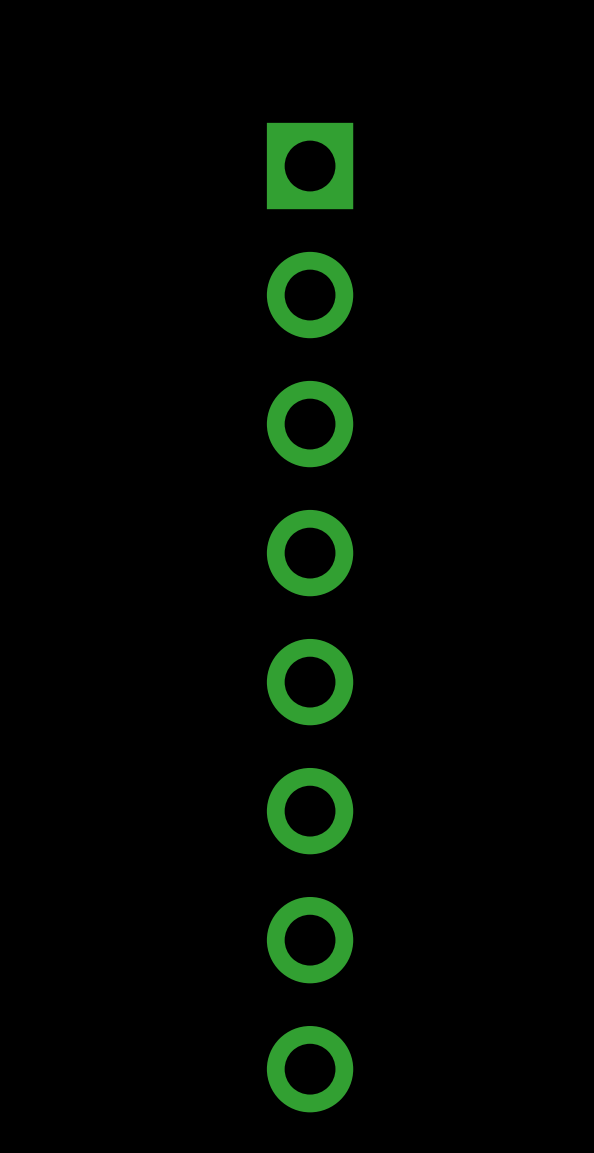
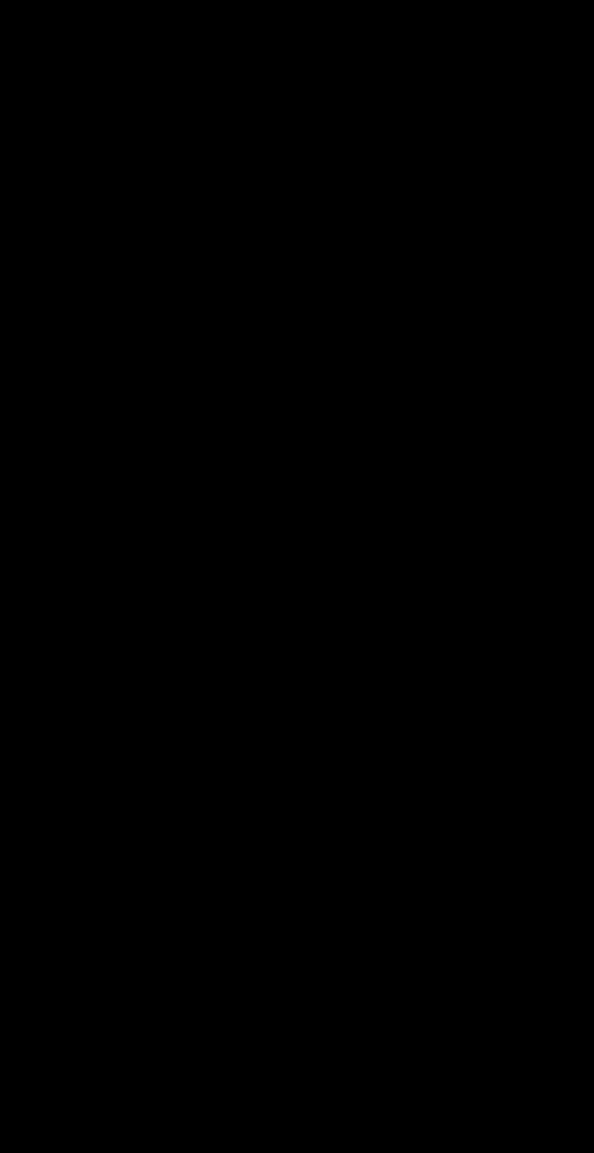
part: (310, 617) -> none

